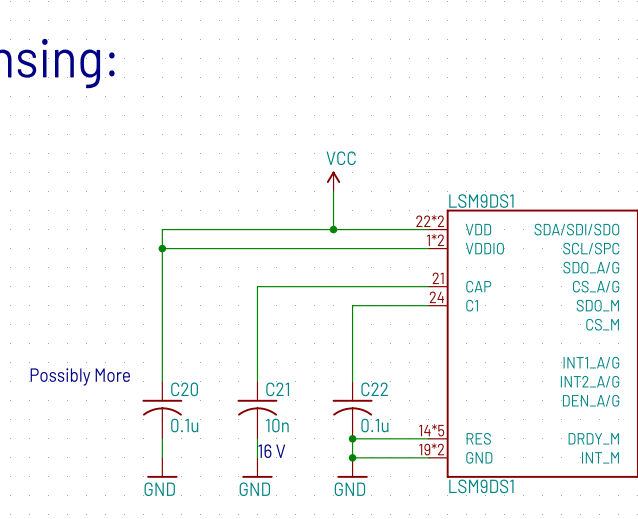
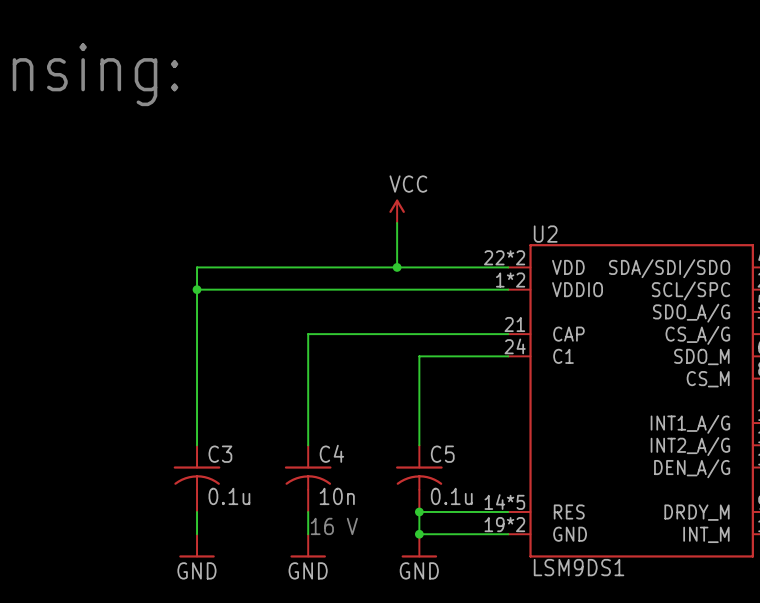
LSM9DS1 name: LSM9DS1 (481, 201) -> U2 (545, 234)
text: Possibly More (80, 376) -> none
C20 name: C20 (184, 389) -> C3 (220, 454)
C21 name: C21 (277, 389) -> C4 (331, 453)
C22 name: C22 (374, 389) -> C5 (442, 454)

